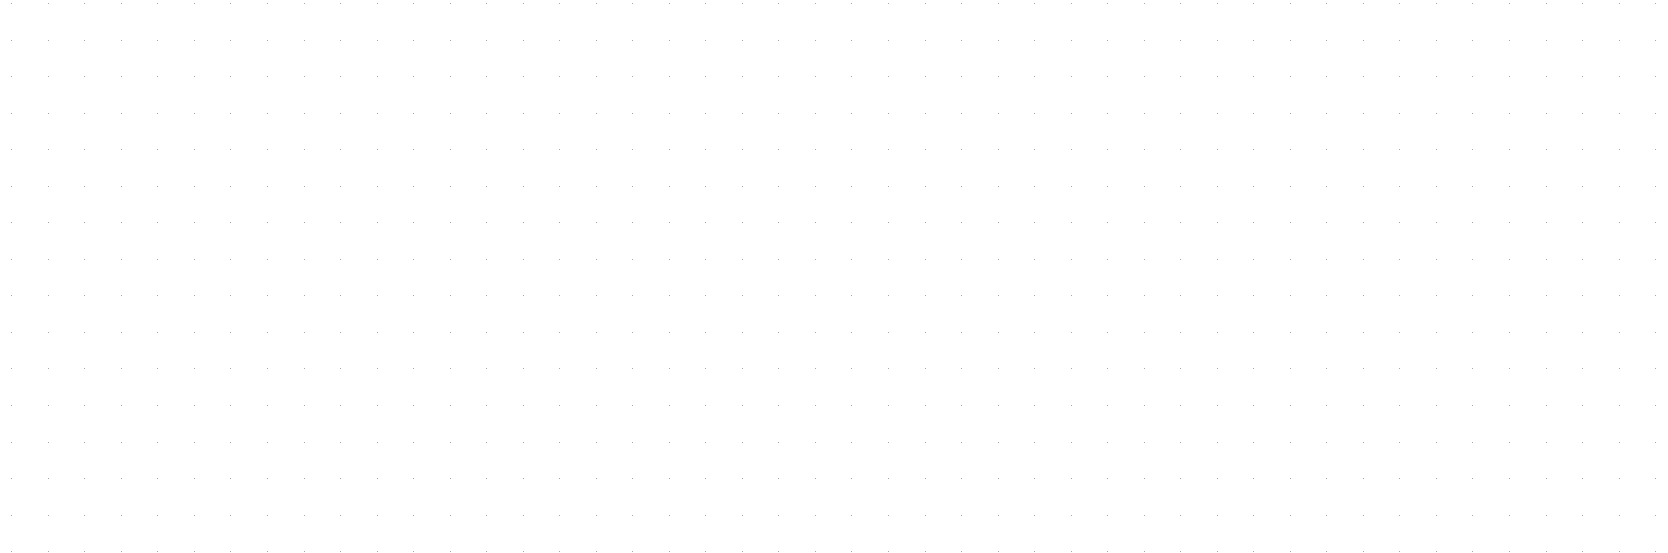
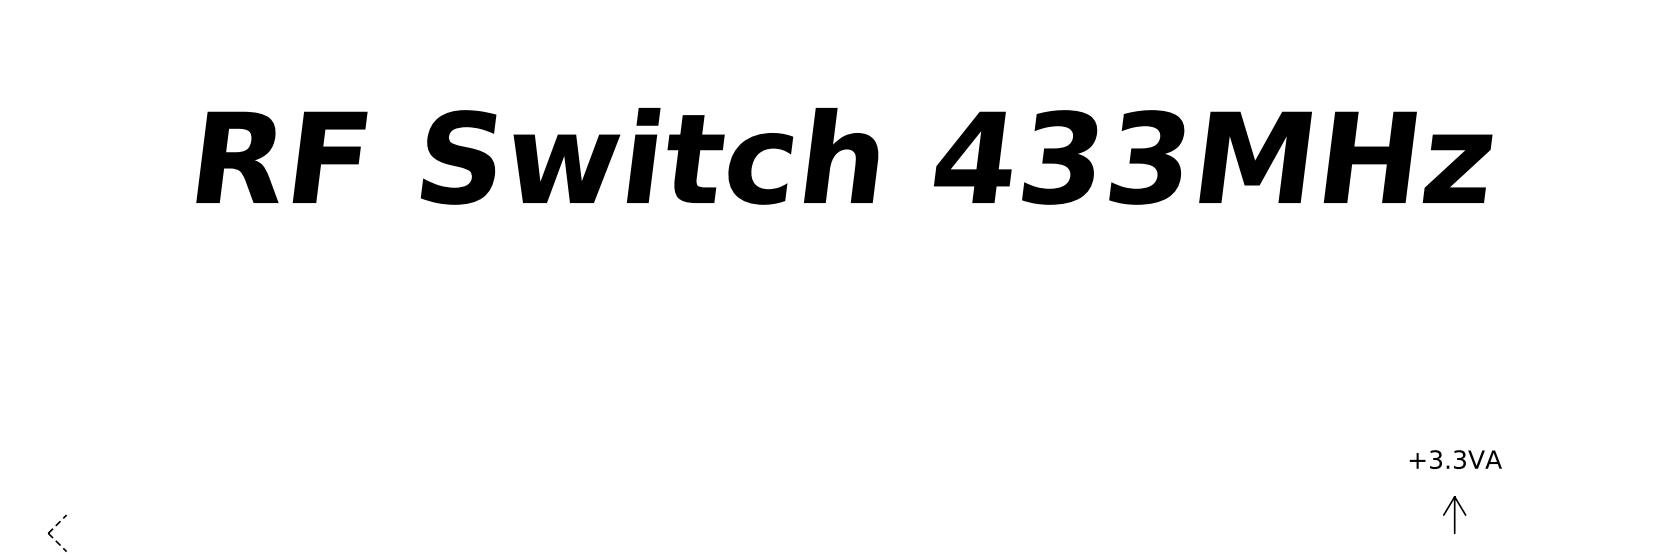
text: none -> RF Switch 433MHz (844, 156)
line: none -> (66, 515) (48, 533) (66, 551)
power symbol: none -> +3.3VA (1454, 515)

